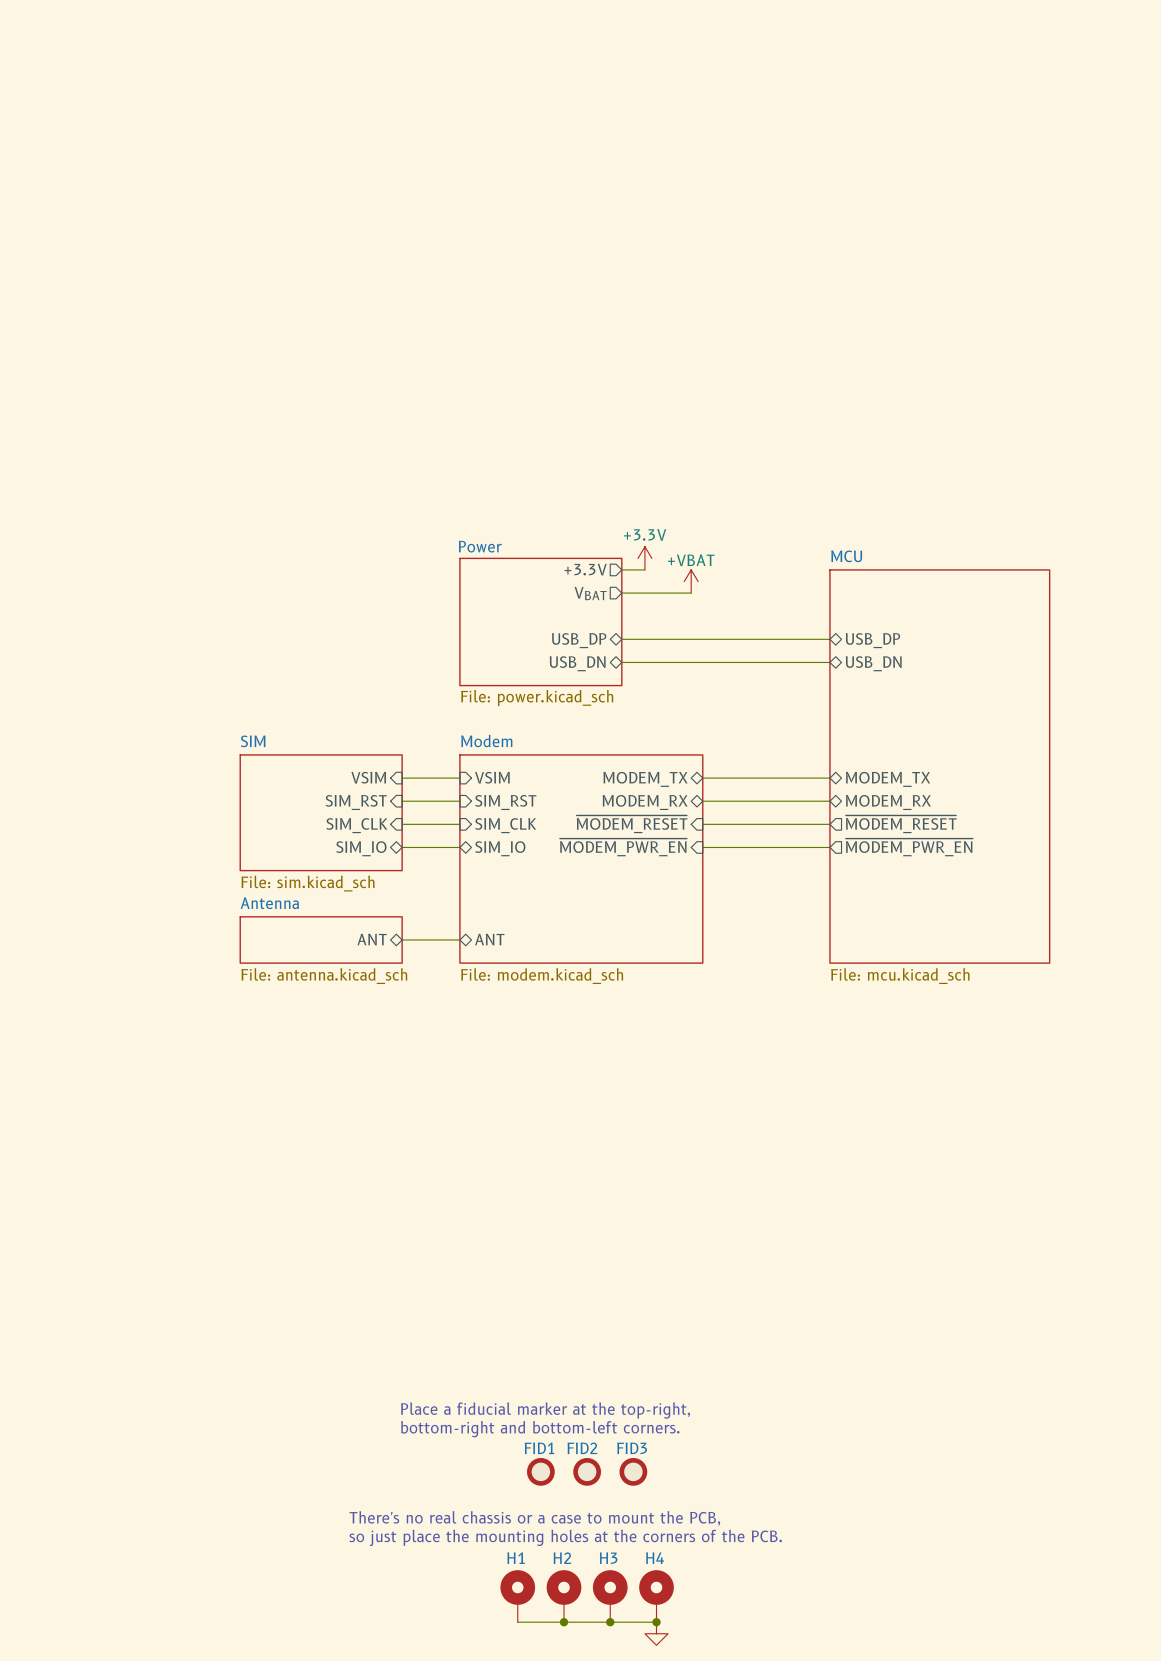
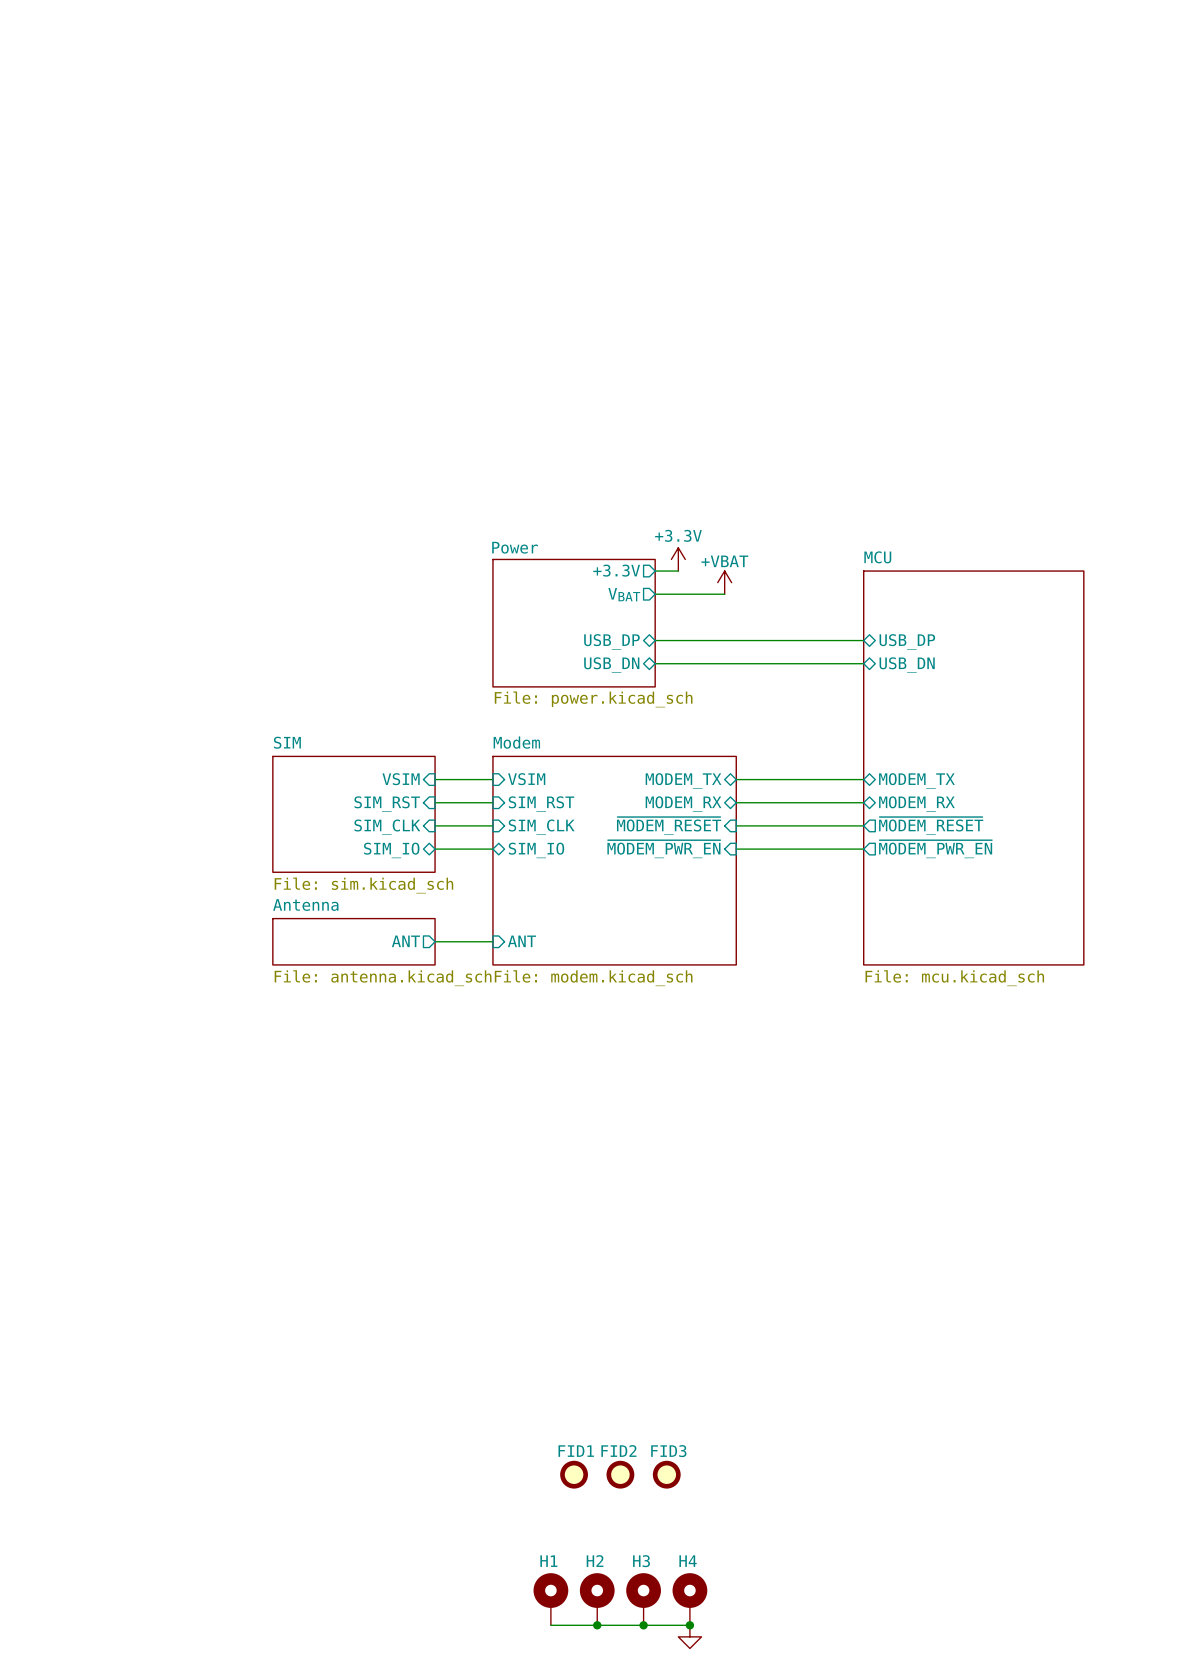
sheet pin shape: bidirectional (372, 939) -> output (405, 941)
sheet pin shape: bidirectional (489, 939) -> input (522, 941)
text: Place a fiducial marker at the top-right, (545, 1410) -> none
text: bottom-right and bottom-left corners. (540, 1429) -> none
text: There's no real chassis or a case to mount the PCB, (534, 1518) -> none
text: so just place the mounting holes at the corners of the PCB. (565, 1537) -> none

